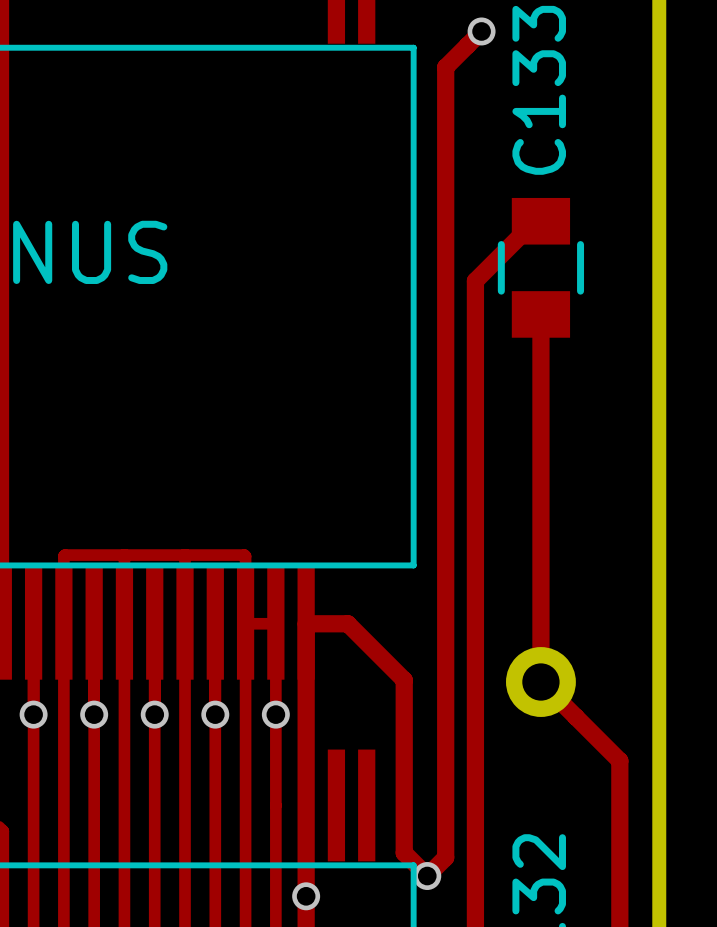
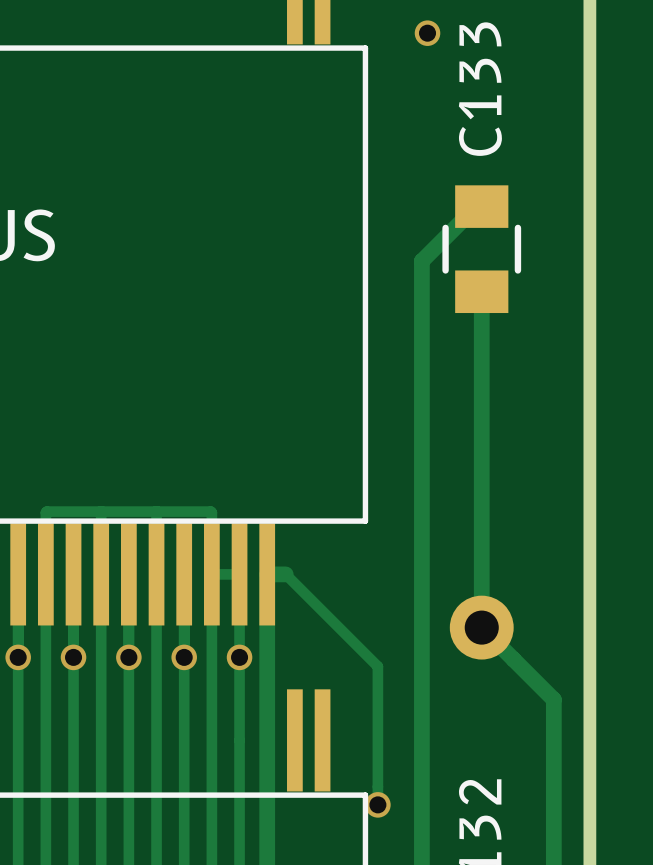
track: (481, 31) (445, 67) (445, 857) (427, 876) (404, 852) (404, 680) (347, 623) (326, 623) -> (377, 804) (377, 666) (285, 574)
via: (306, 896) -> none

